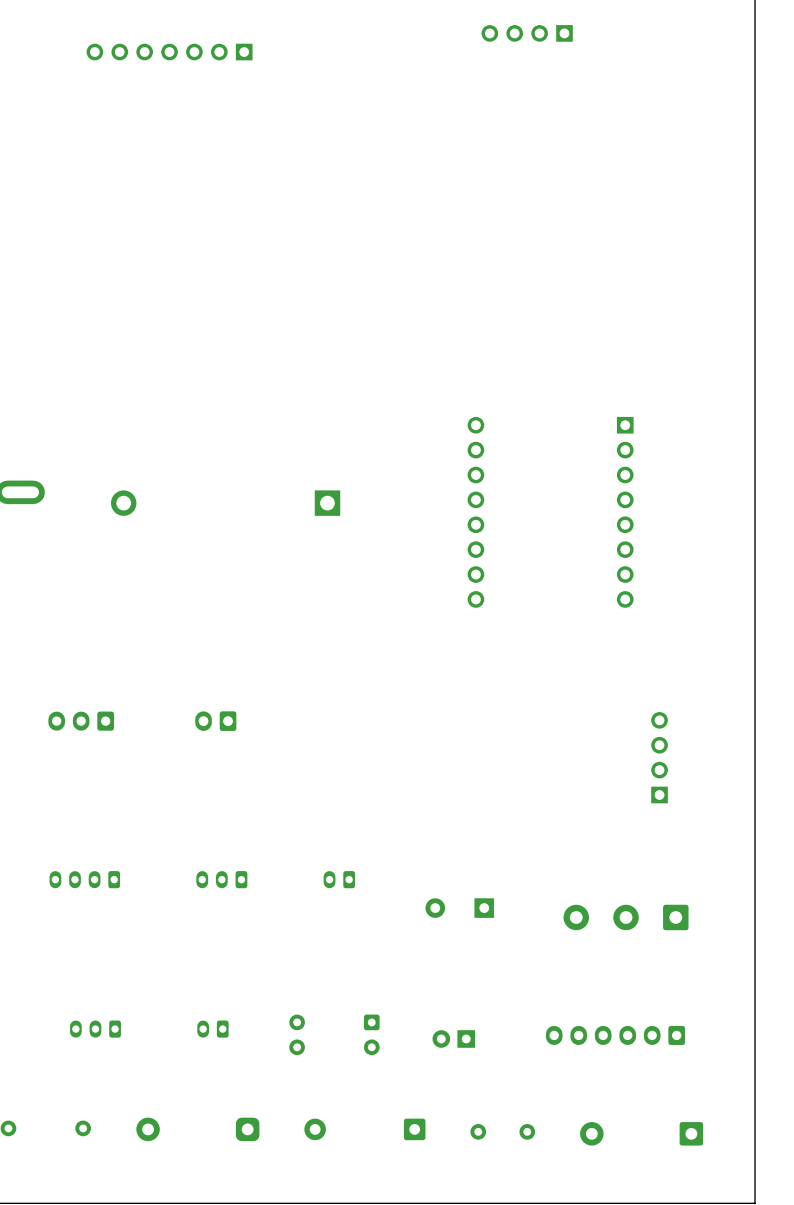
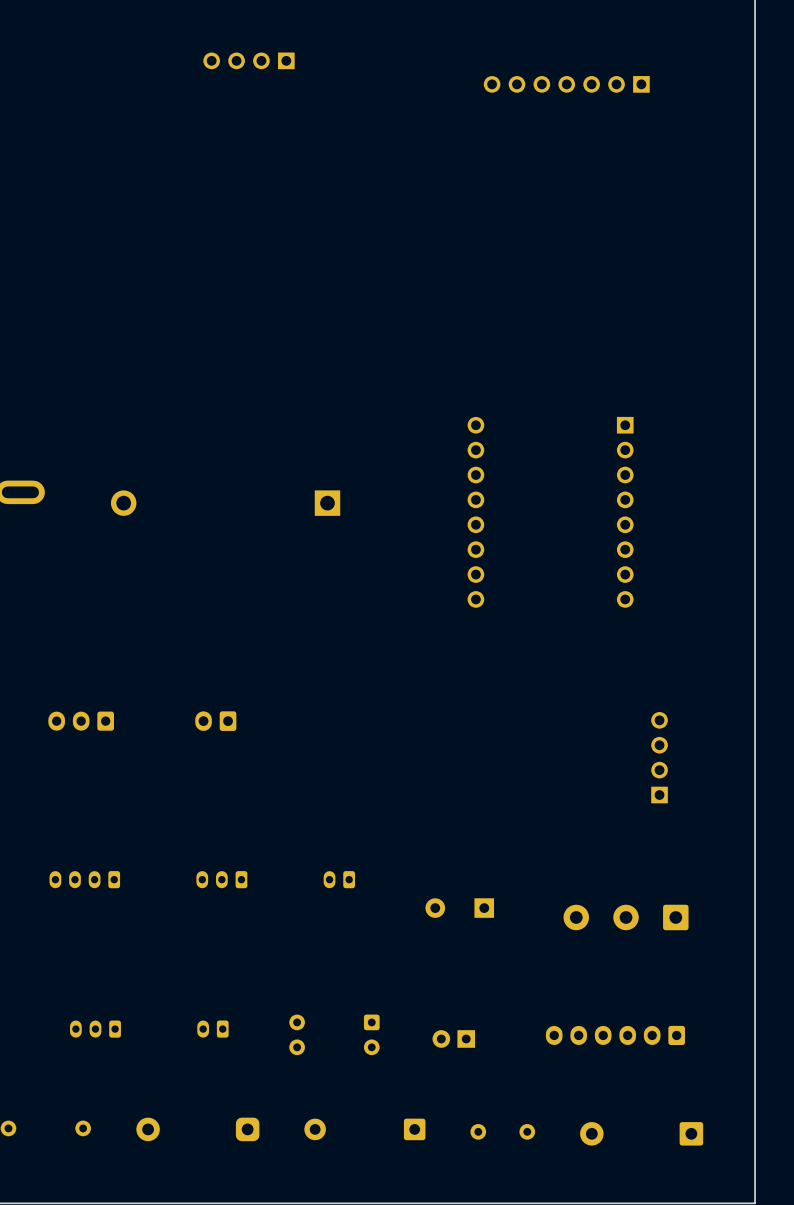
part: (527, 33) -> none
part: (169, 52) -> none
part: none -> (249, 60)
part: none -> (566, 84)

